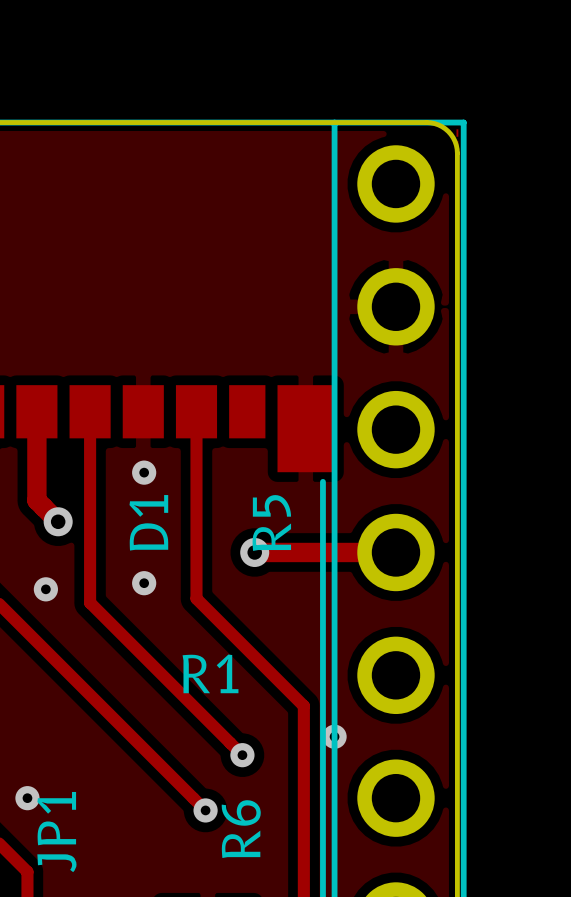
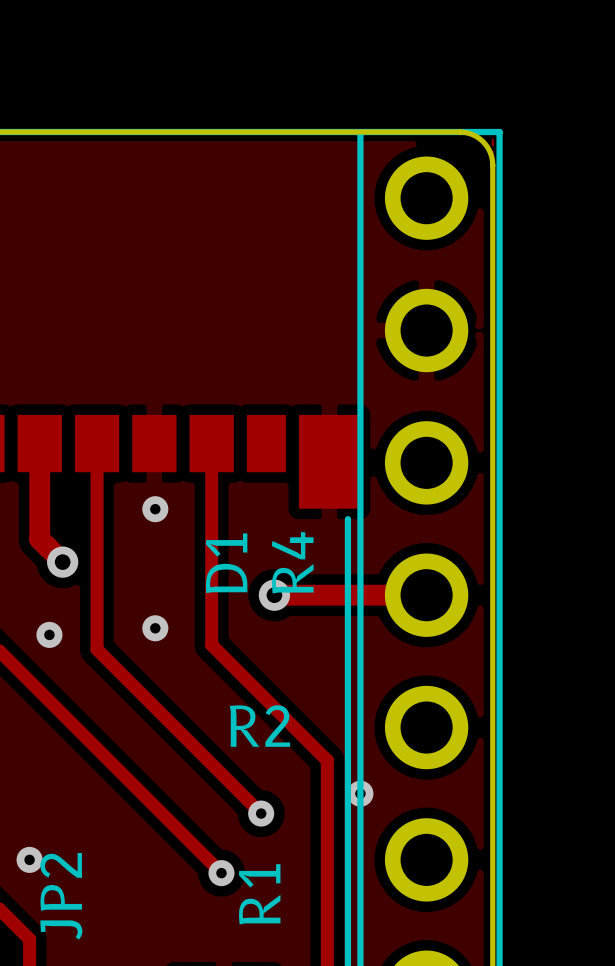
D1 name position: D1 (148, 522) -> D1 (226, 563)
R5 name: R5 (271, 522) -> R4 (292, 562)
R1 name: R1 (210, 673) -> R2 (259, 726)
R6 name: R6 (241, 829) -> R1 (259, 894)
JP1 name: JP1 (56, 832) -> JP2 (61, 896)

